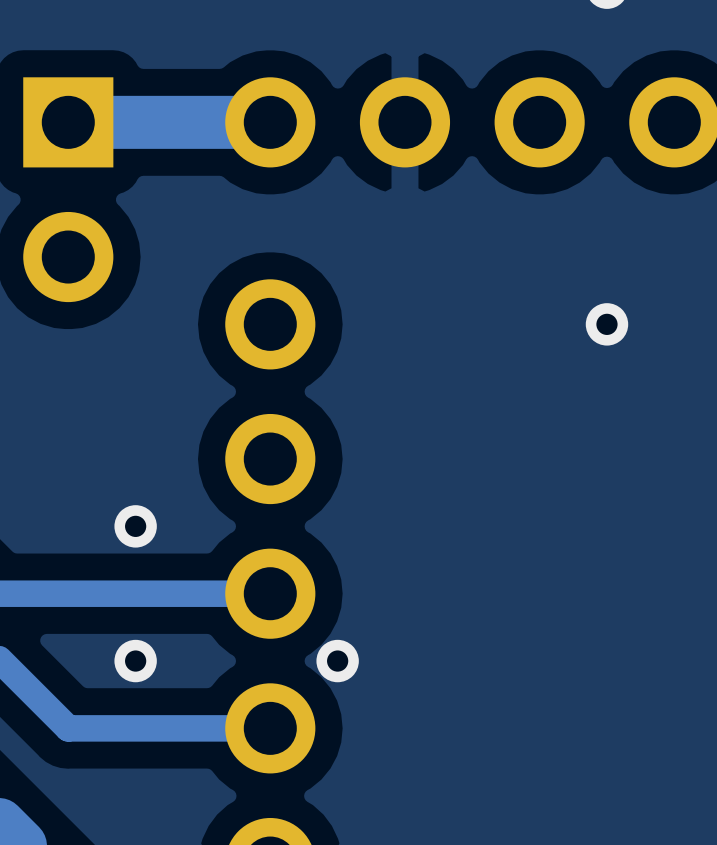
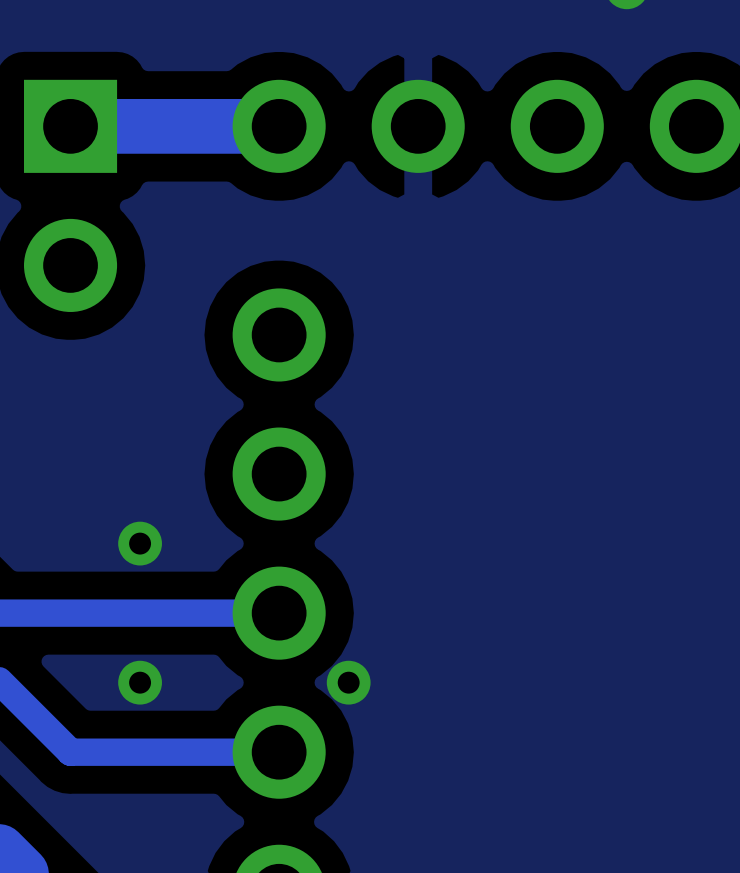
via: (606, 324) -> none

